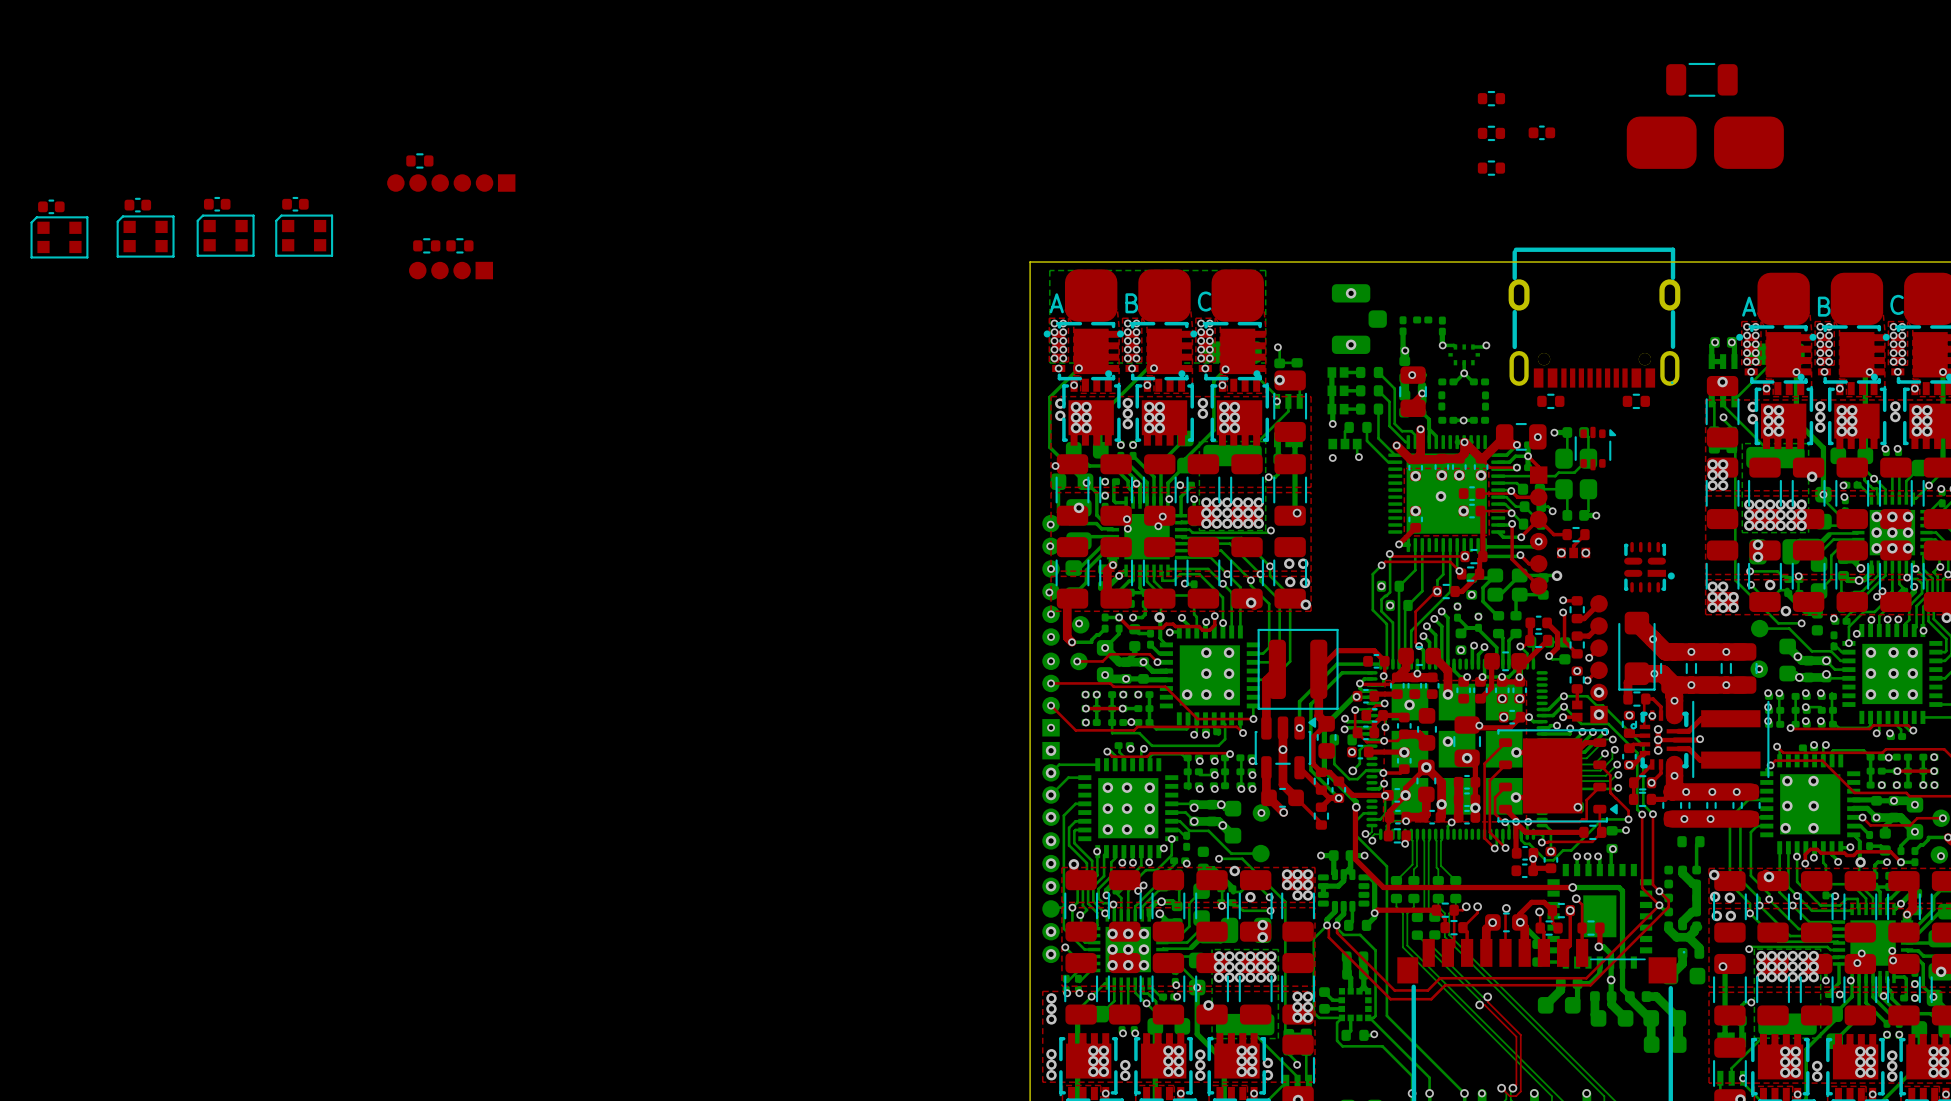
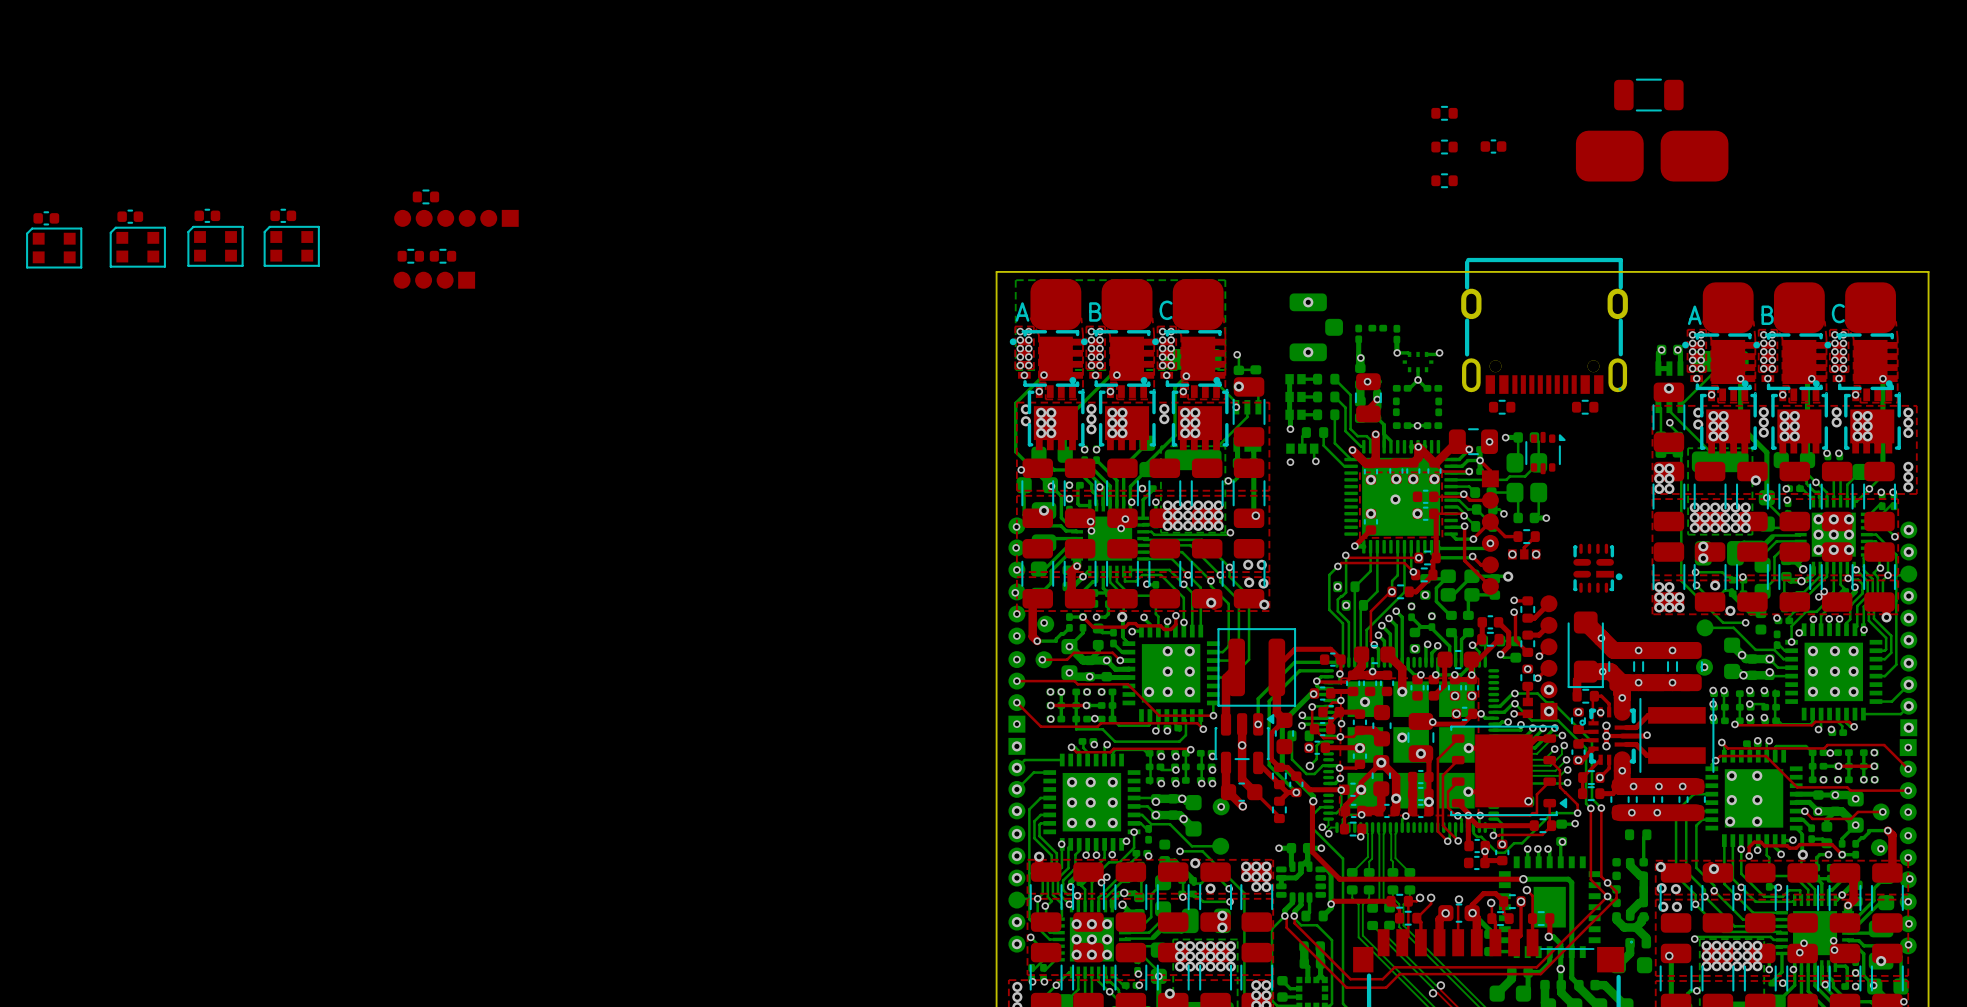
part: (419, 160) -> none
part footprint: [387, 174, 516, 192] -> [412, 189, 440, 205]
part: none -> (456, 218)

